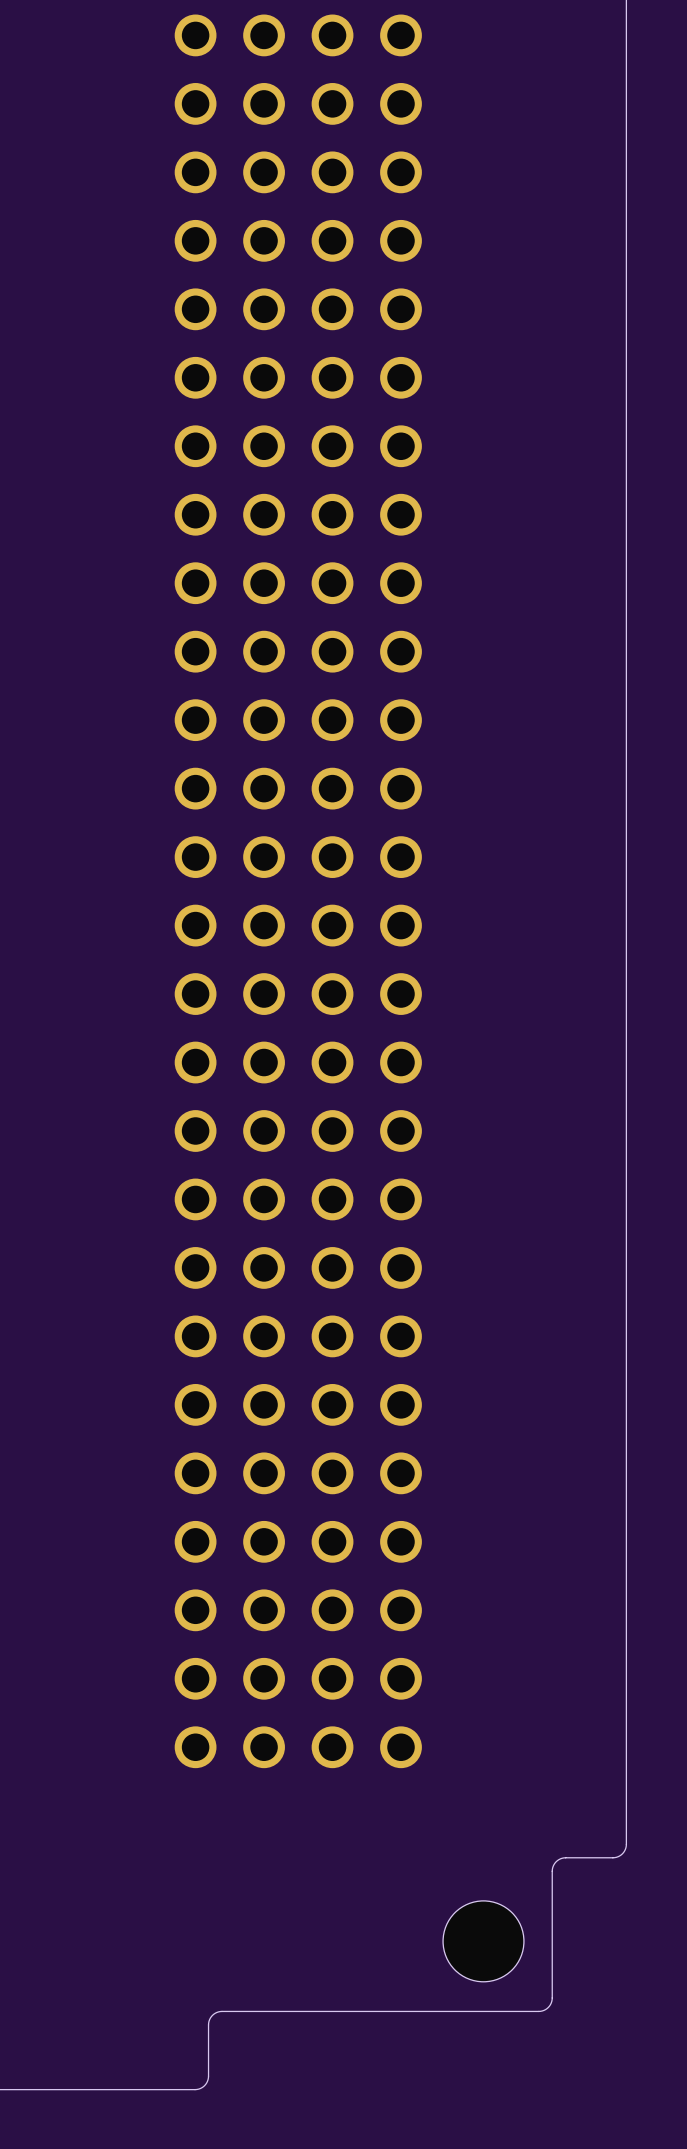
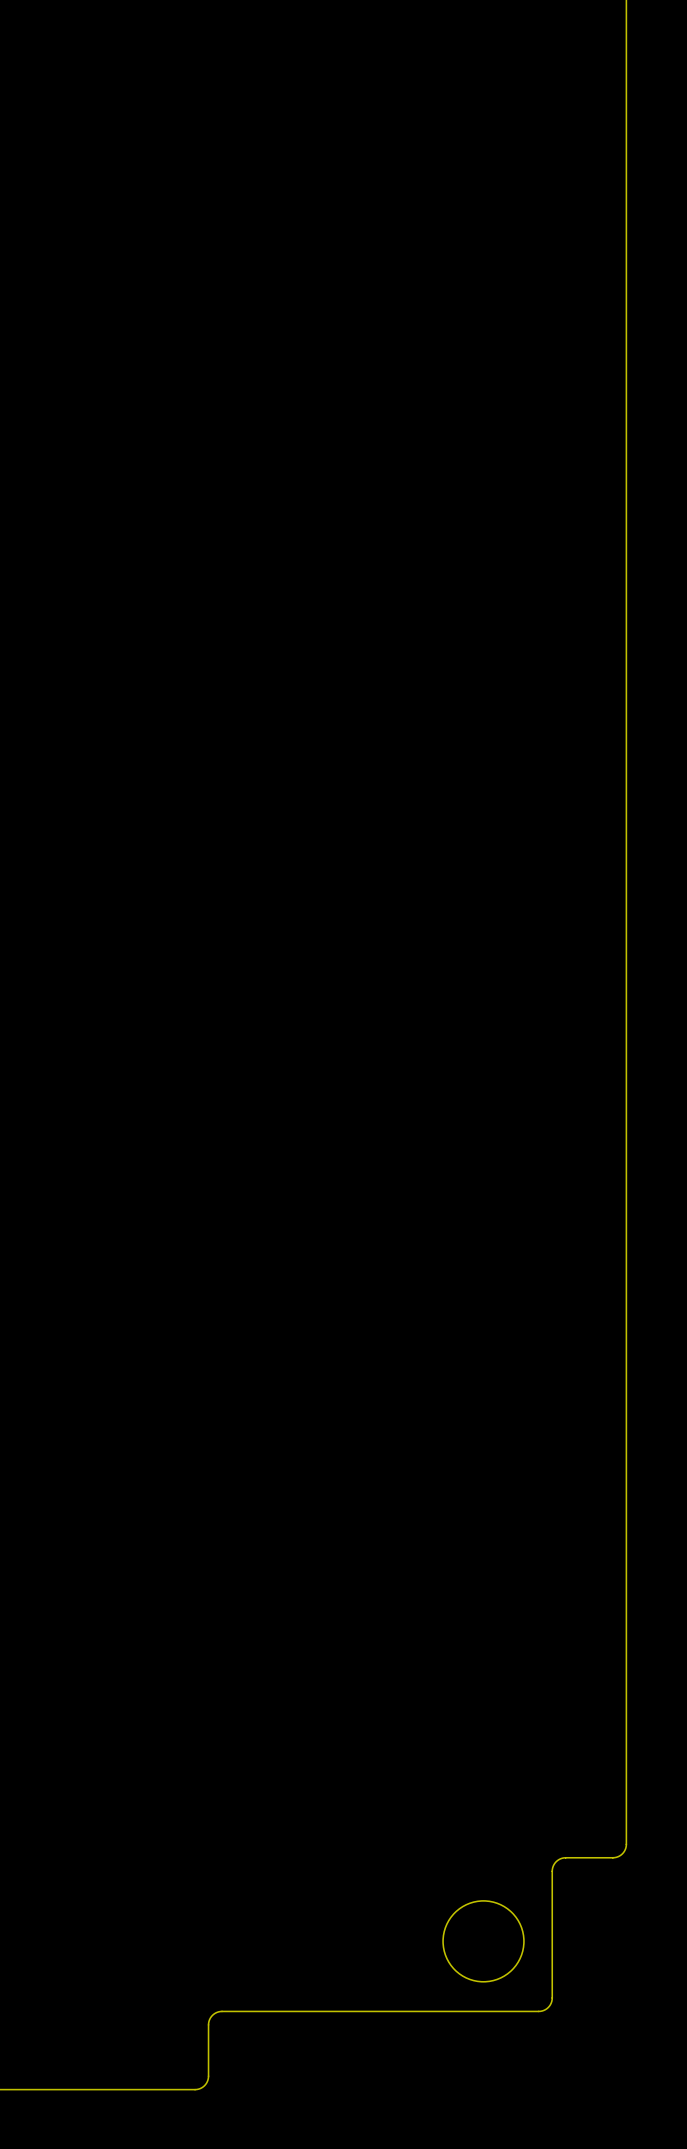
part: (229, 891) -> none
part: (366, 891) -> none

